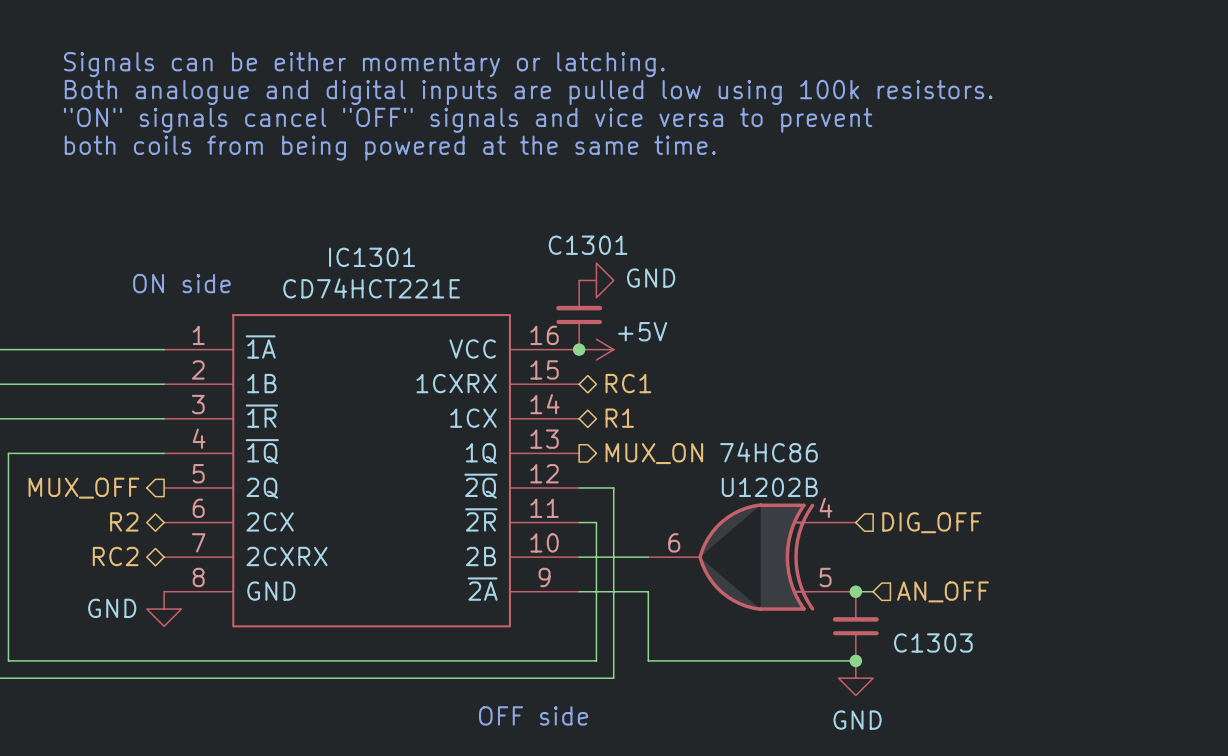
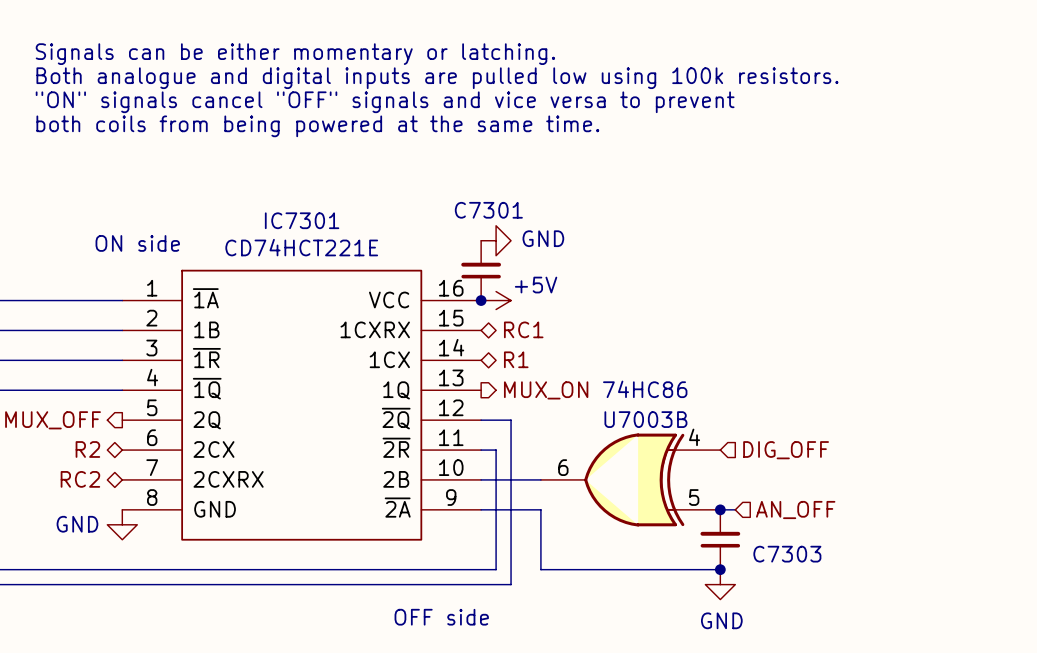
C1301 name: C1301 (588, 245) -> C7301 (488, 210)
IC1301 name: IC1301 (372, 257) -> IC7301 (302, 220)
U1202B name: U1202B (769, 487) -> U7003B (645, 419)
C1303 name: C1303 (933, 642) -> C7303 (787, 554)

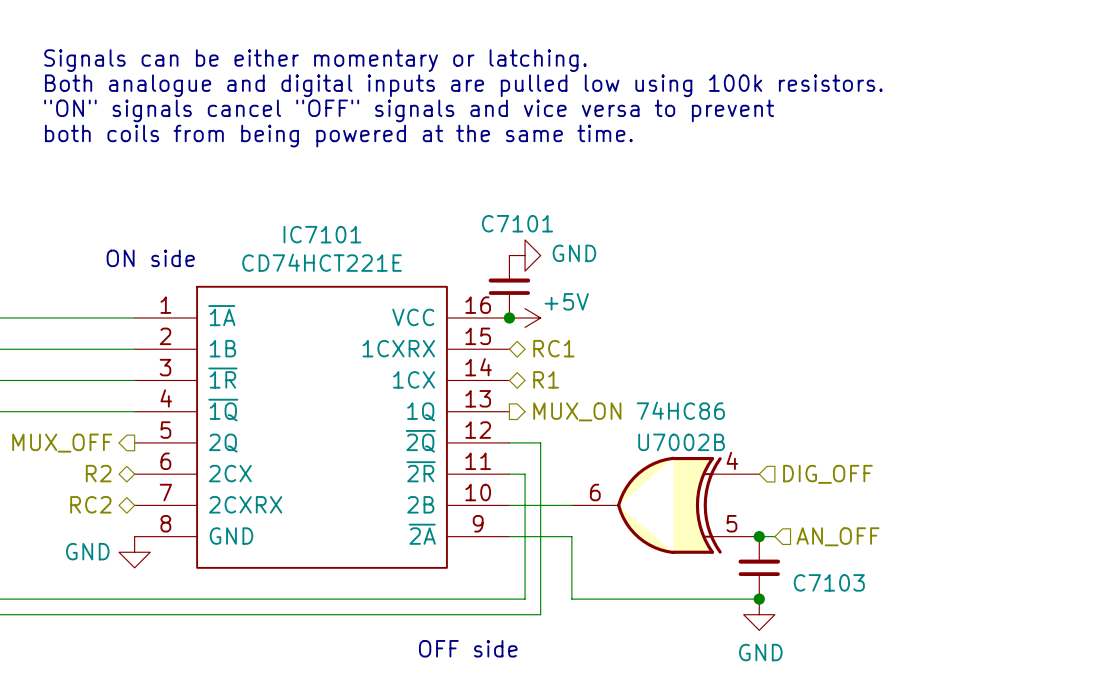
C7301 name: C7301 (488, 210) -> C7101 (517, 223)
IC7301 name: IC7301 (302, 220) -> IC7101 (322, 234)
U7003B name: U7003B (645, 419) -> U7002B (681, 442)
C7303 name: C7303 (787, 554) -> C7103 (829, 582)

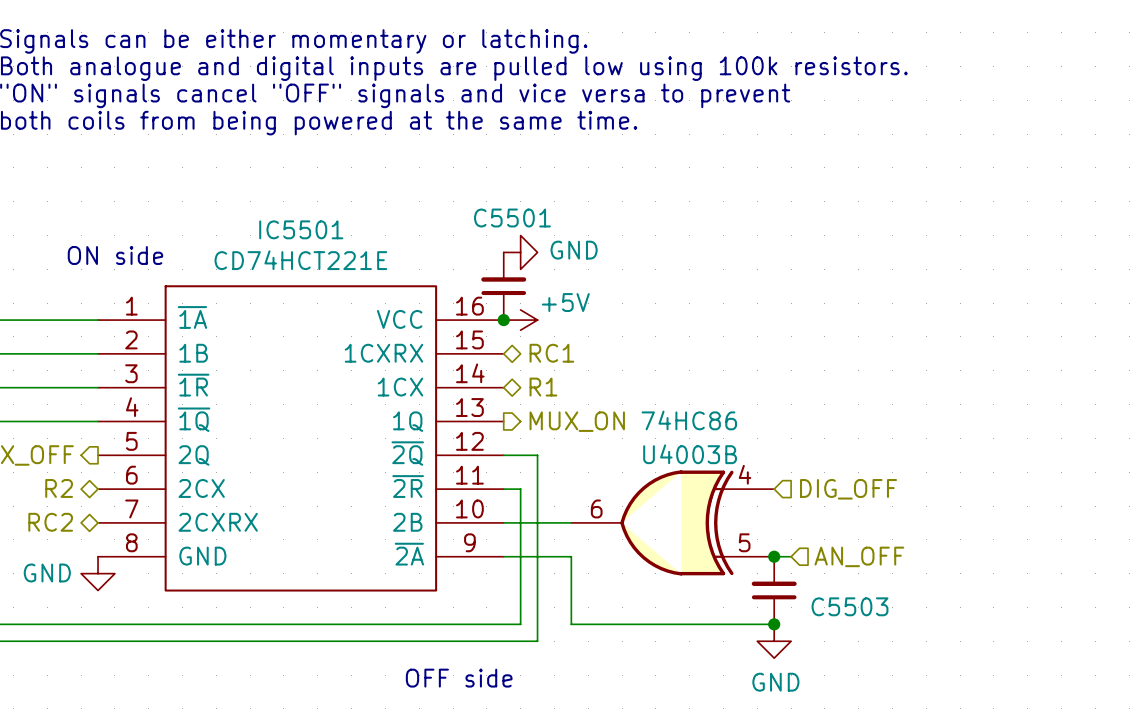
C7101 name: C7101 (517, 223) -> C5501 (512, 218)
IC7101 name: IC7101 (322, 234) -> IC5501 (301, 229)
U7002B name: U7002B (681, 442) -> U4003B (690, 454)
C7103 name: C7103 (829, 582) -> C5503 (849, 606)

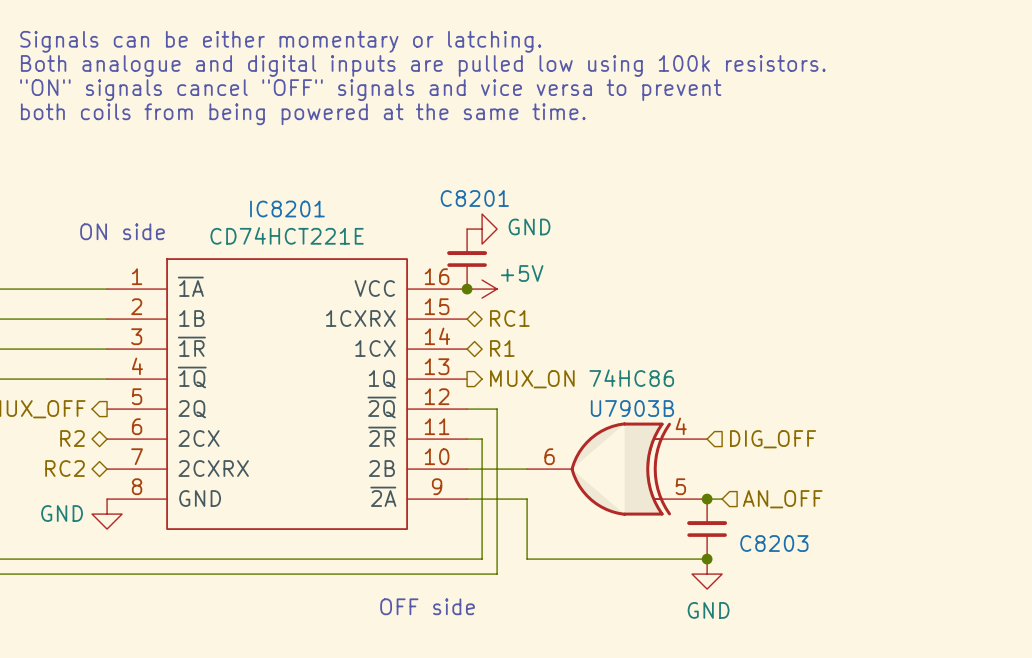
C5501 name: C5501 (512, 218) -> C8201 (474, 198)
IC5501 name: IC5501 (301, 229) -> IC8201 (287, 209)
U4003B name: U4003B (690, 454) -> U7903B (632, 408)
C5503 name: C5503 (849, 606) -> C8203 (774, 543)

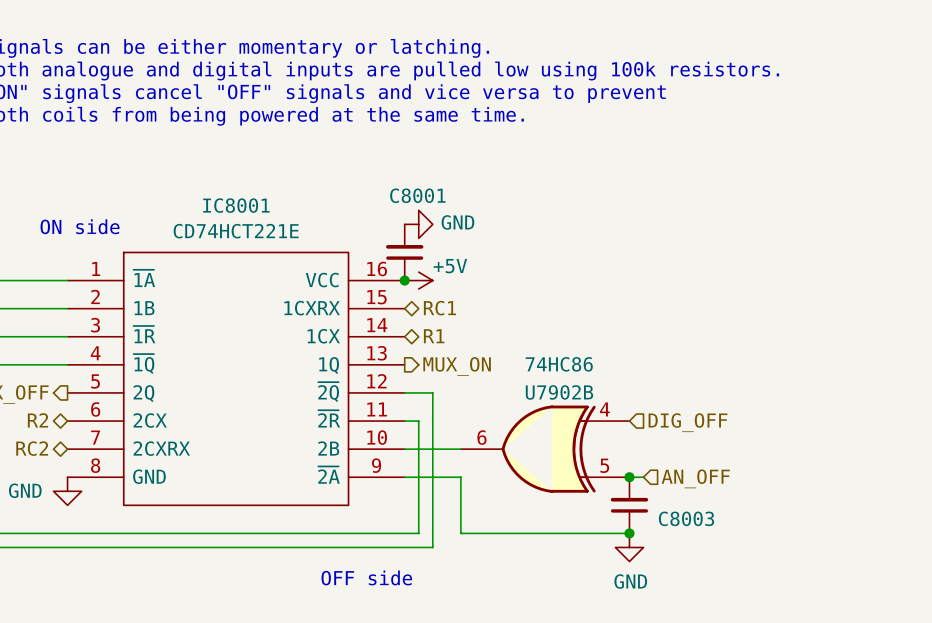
C8201 name: C8201 (474, 198) -> C8001 (417, 195)
IC8201 name: IC8201 (287, 209) -> IC8001 (236, 205)
U7903B name: U7903B (632, 408) -> U7902B (559, 392)
C8203 name: C8203 (774, 543) -> C8003 (686, 518)

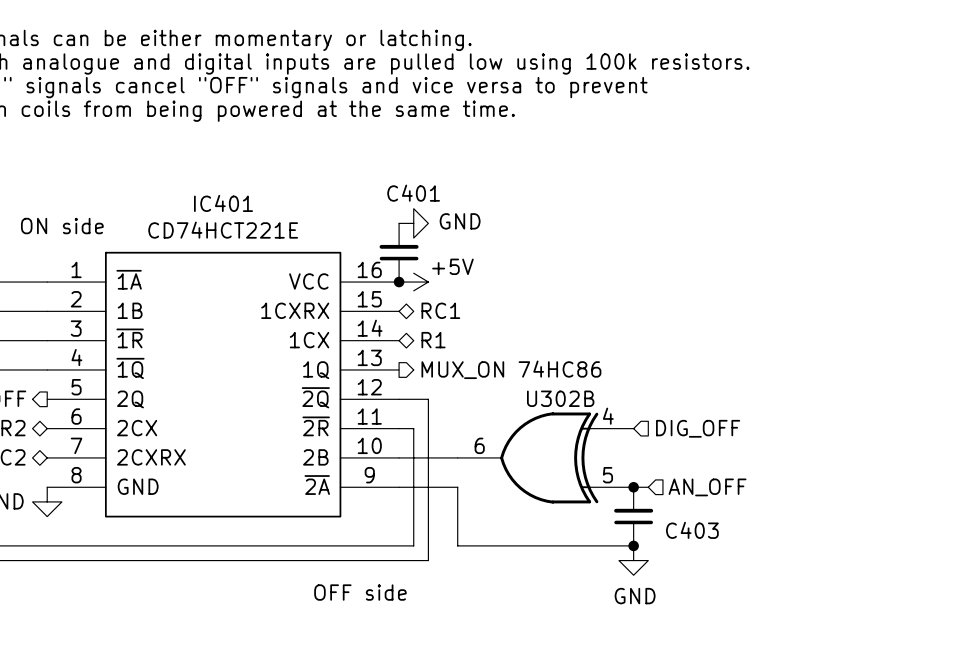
C8001 name: C8001 (417, 195) -> C401 (413, 193)
IC8001 name: IC8001 (236, 205) -> IC401 (223, 203)
U7902B name: U7902B (559, 392) -> U302B (560, 398)
C8003 name: C8003 (686, 518) -> C403 (692, 530)

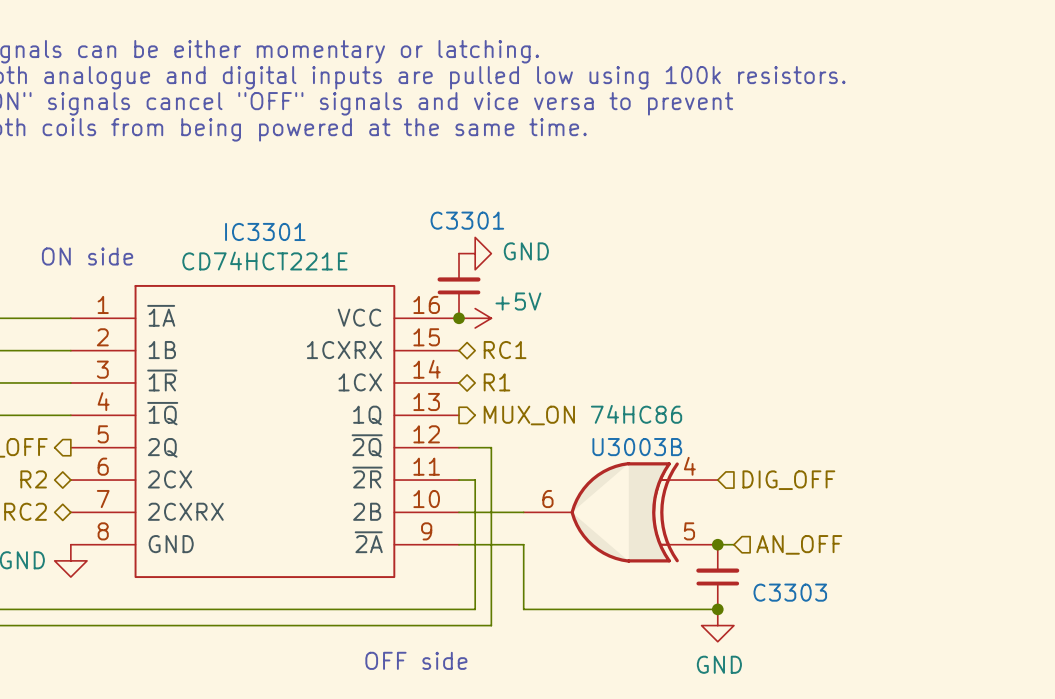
C401 name: C401 (413, 193) -> C3301 (467, 220)
IC401 name: IC401 (223, 203) -> IC3301 (265, 231)
U302B name: U302B (560, 398) -> U3003B (637, 447)
C403 name: C403 (692, 530) -> C3303 (790, 592)

